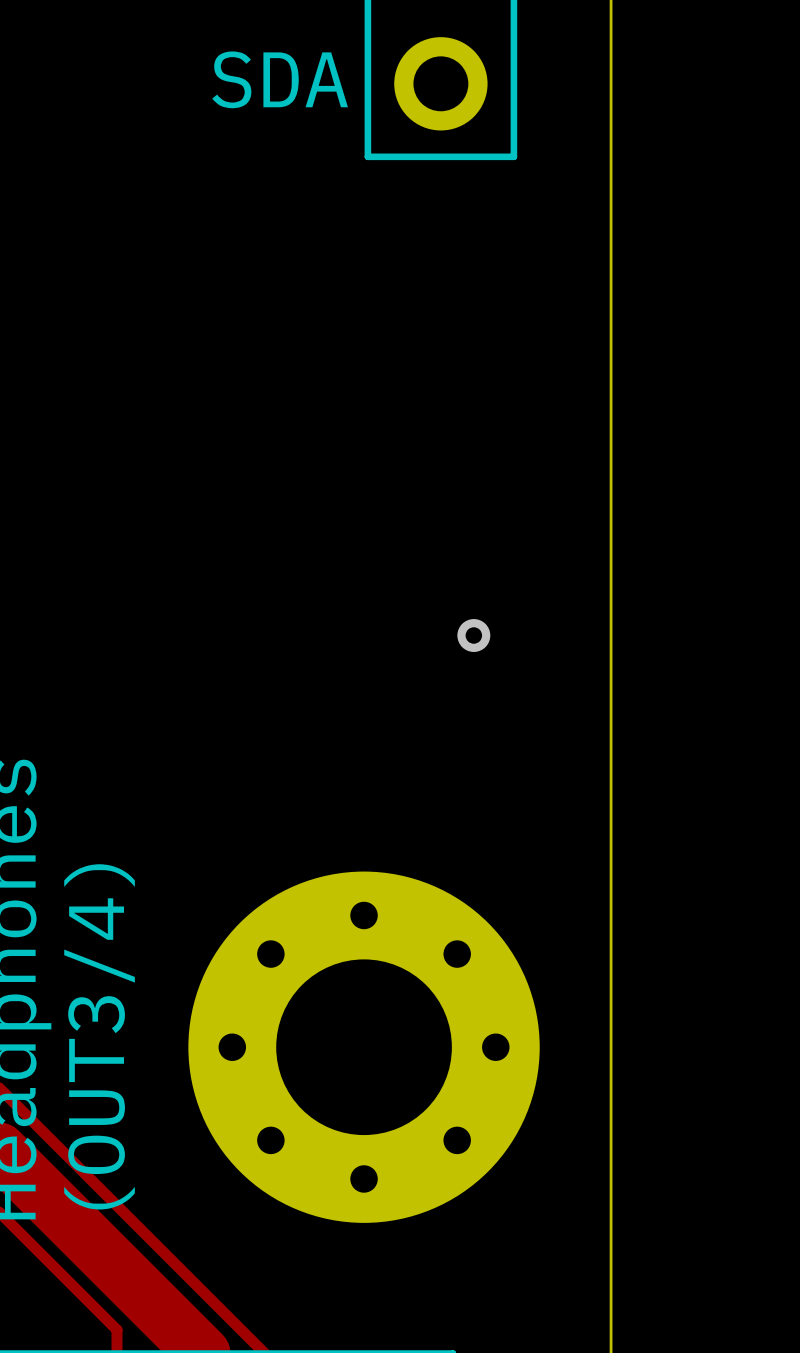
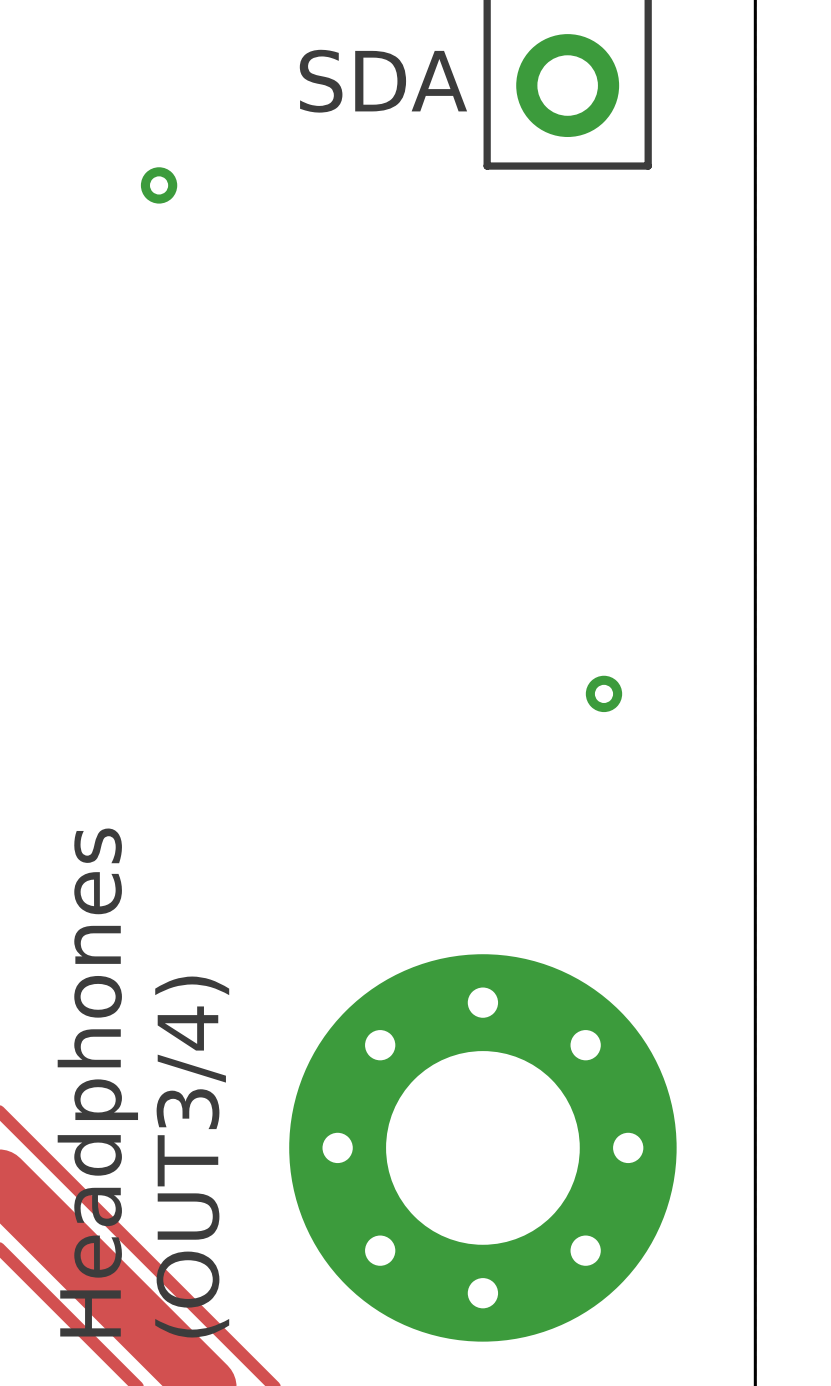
via: none -> (159, 185)

